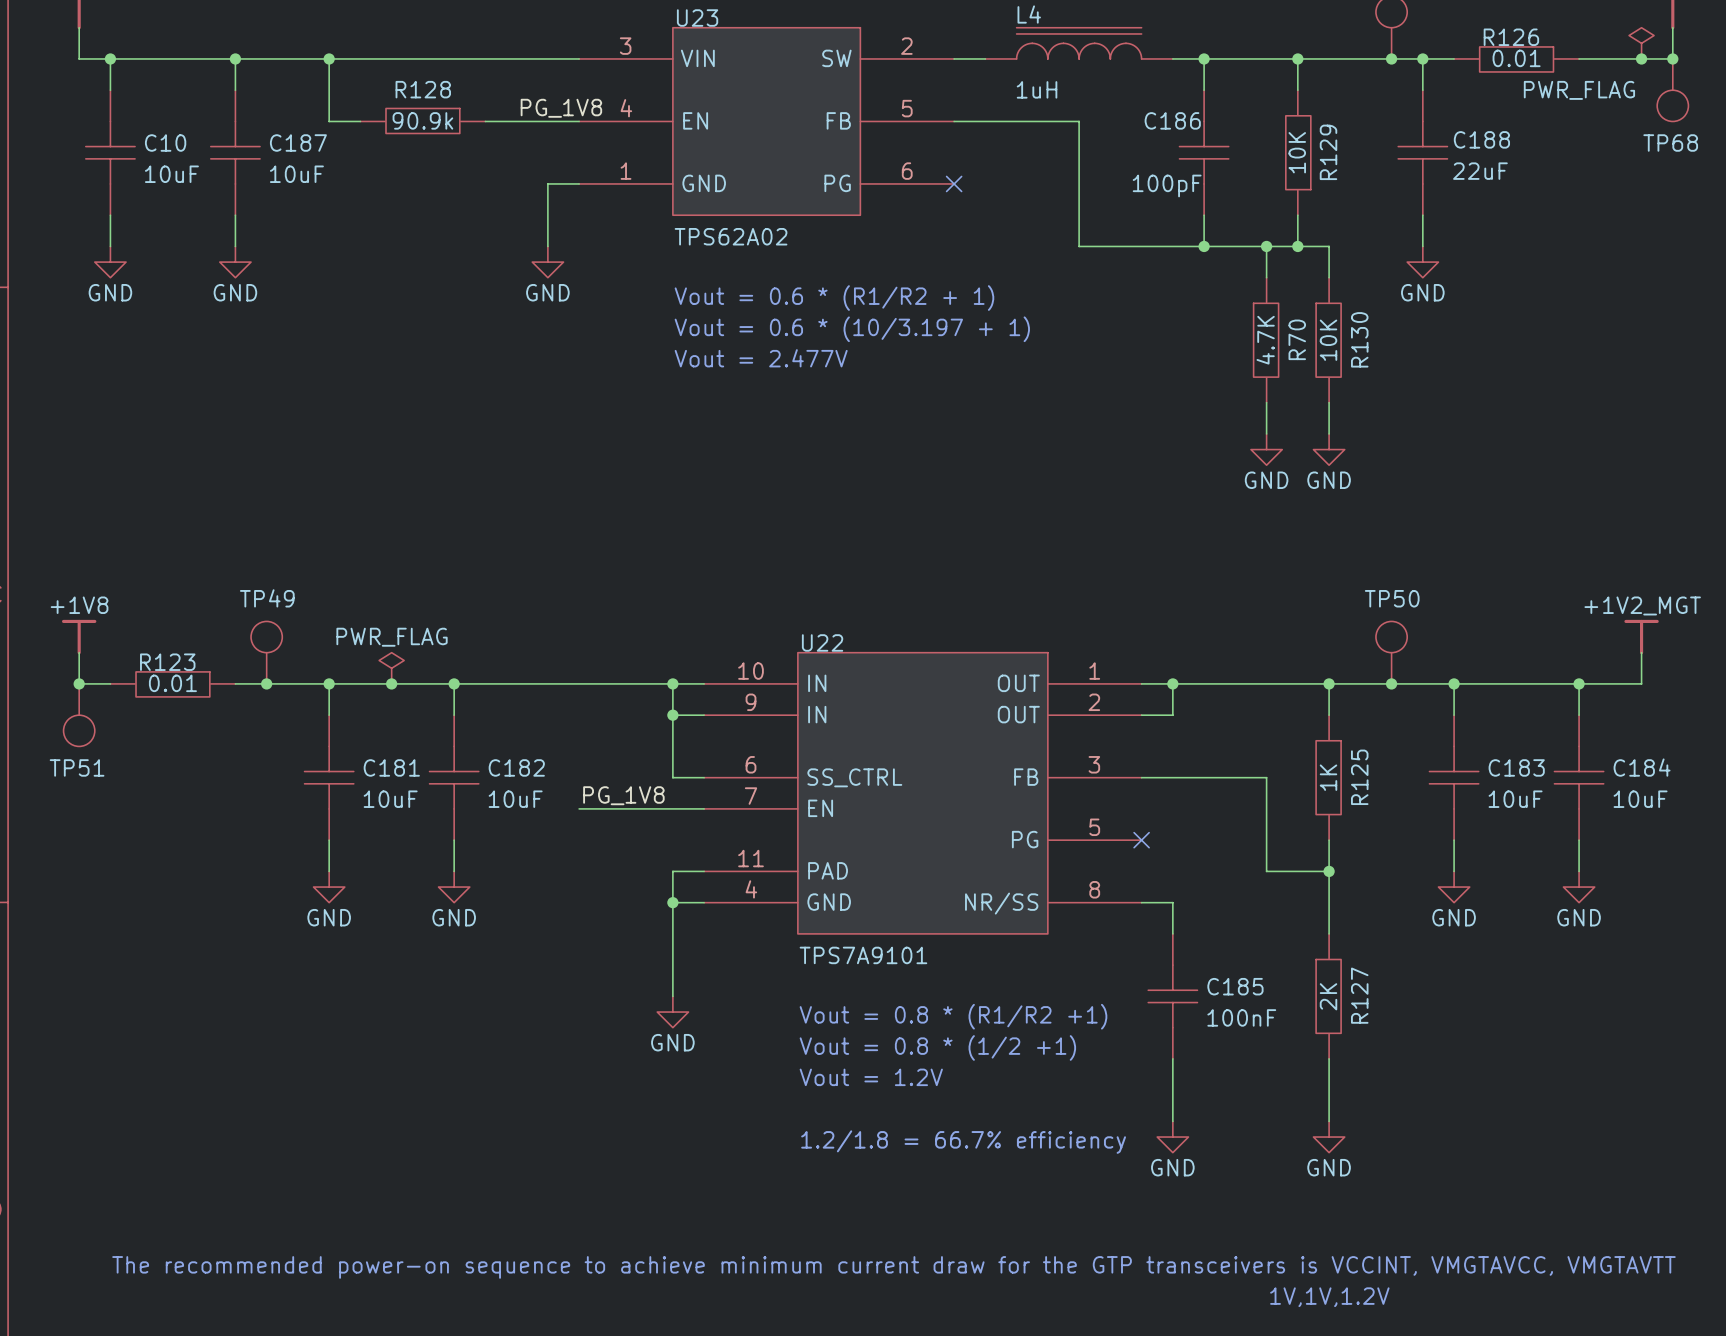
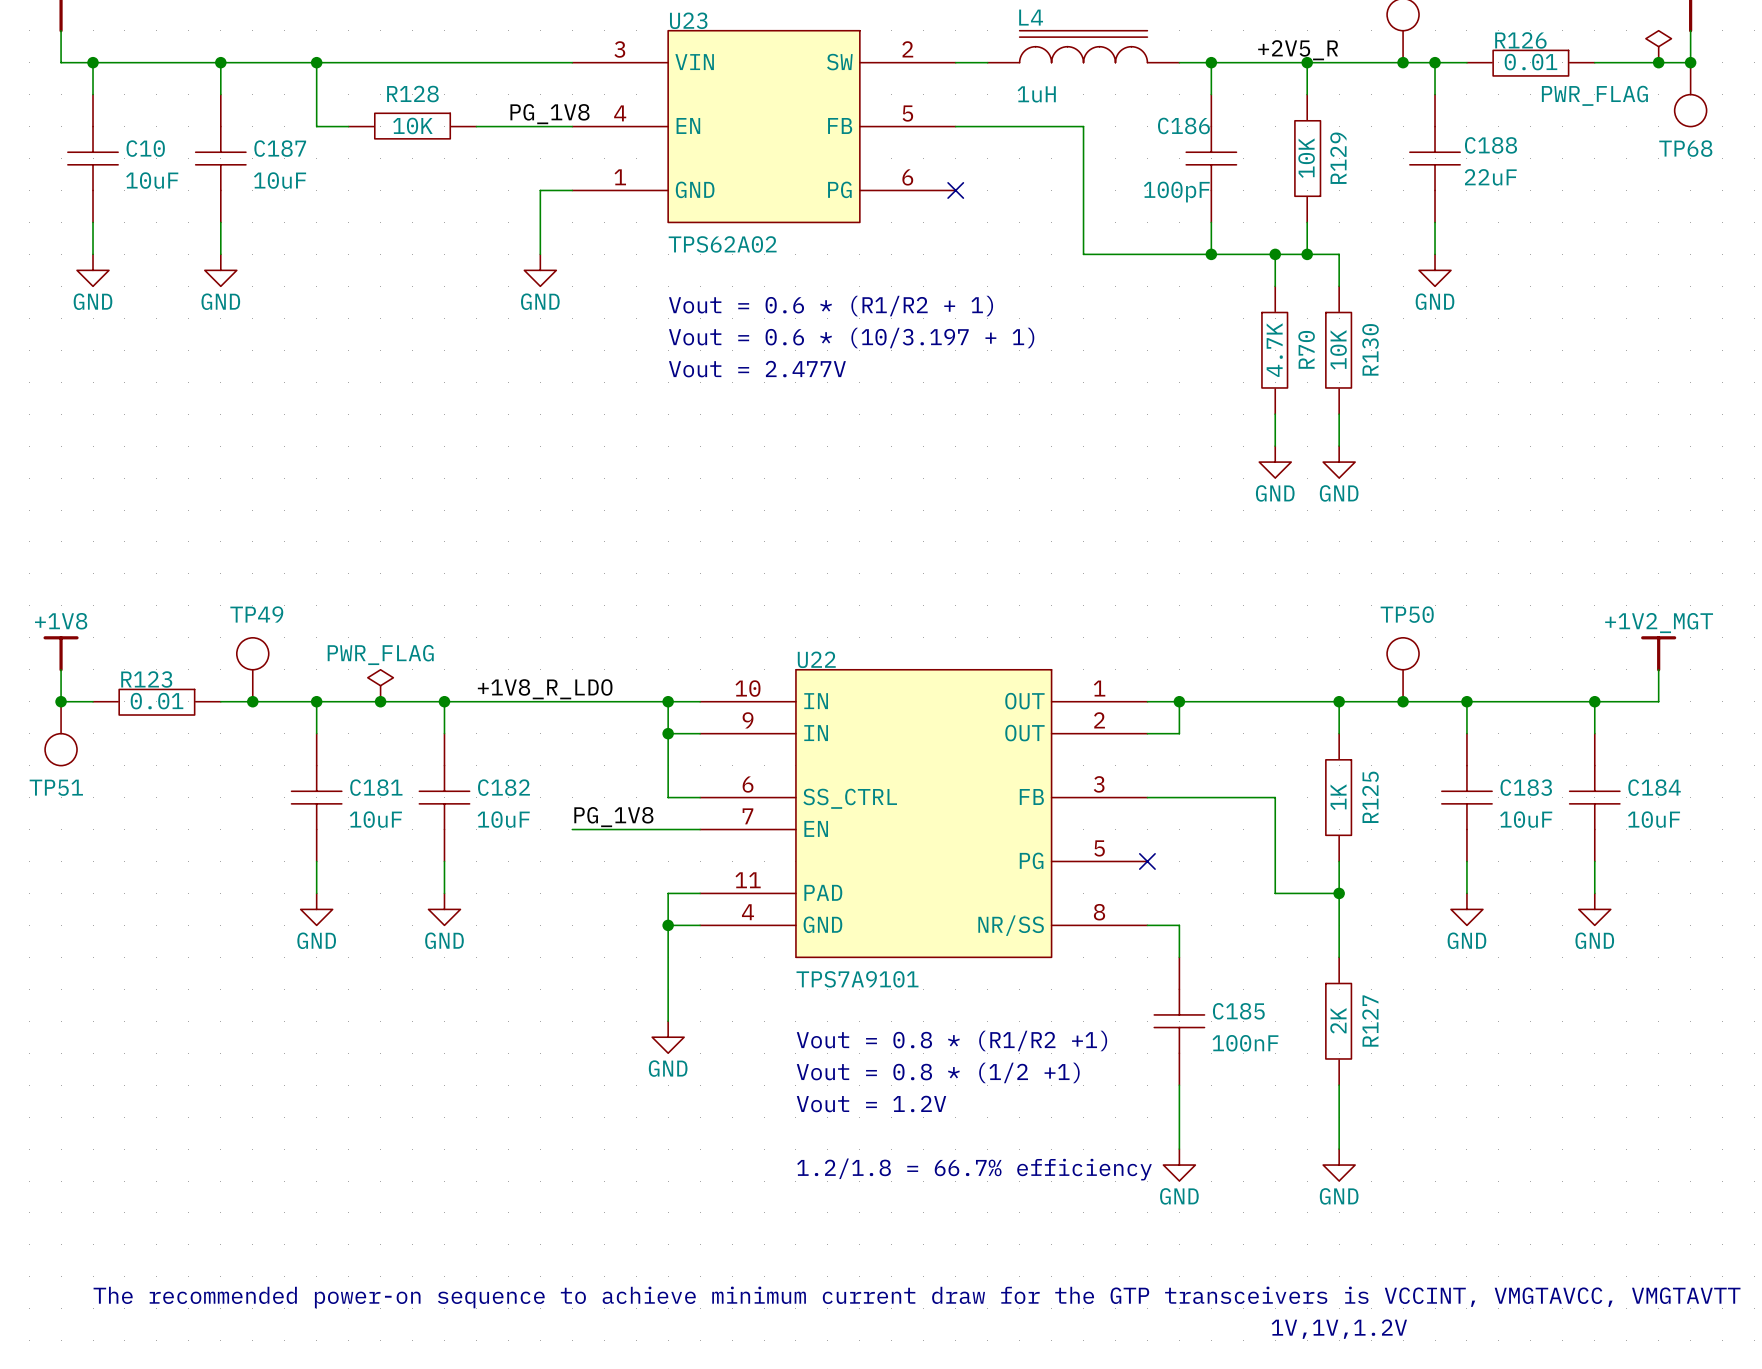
label: none -> +2V5_R (1298, 50)
R128 value: 90.9k (422, 120) -> 10K (412, 125)
label: none -> +1V8_R_LDO (545, 689)

